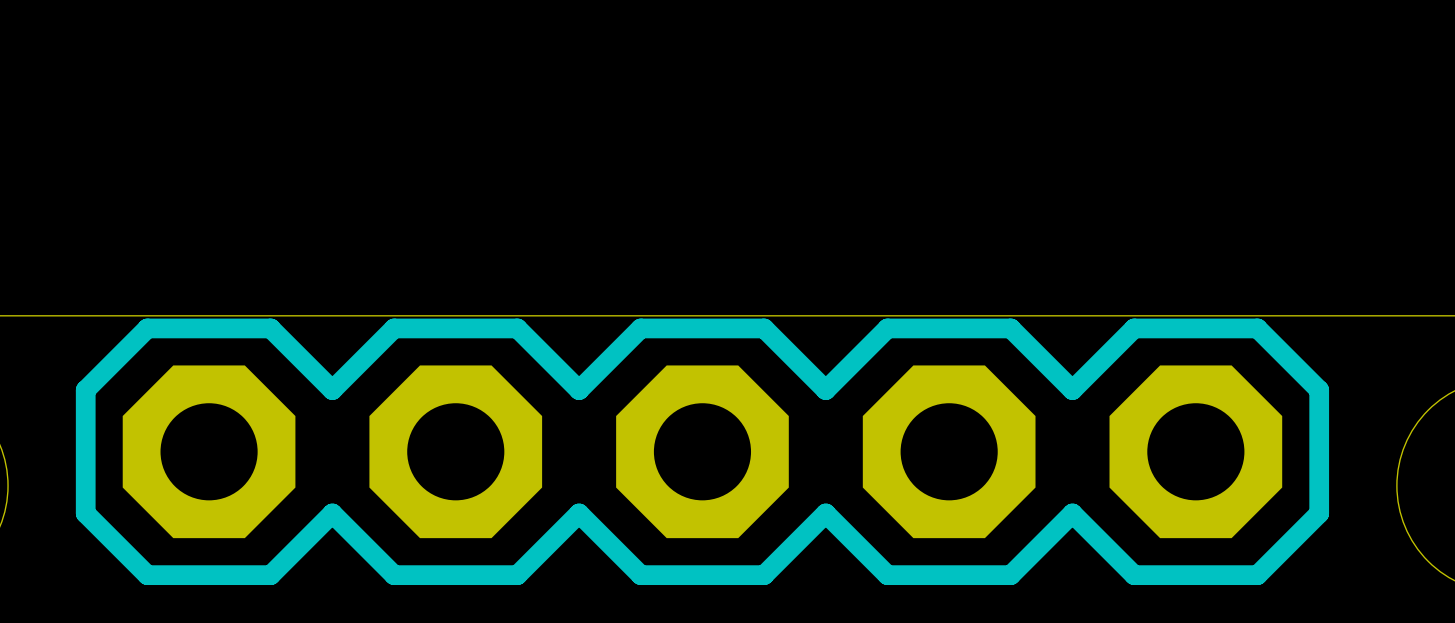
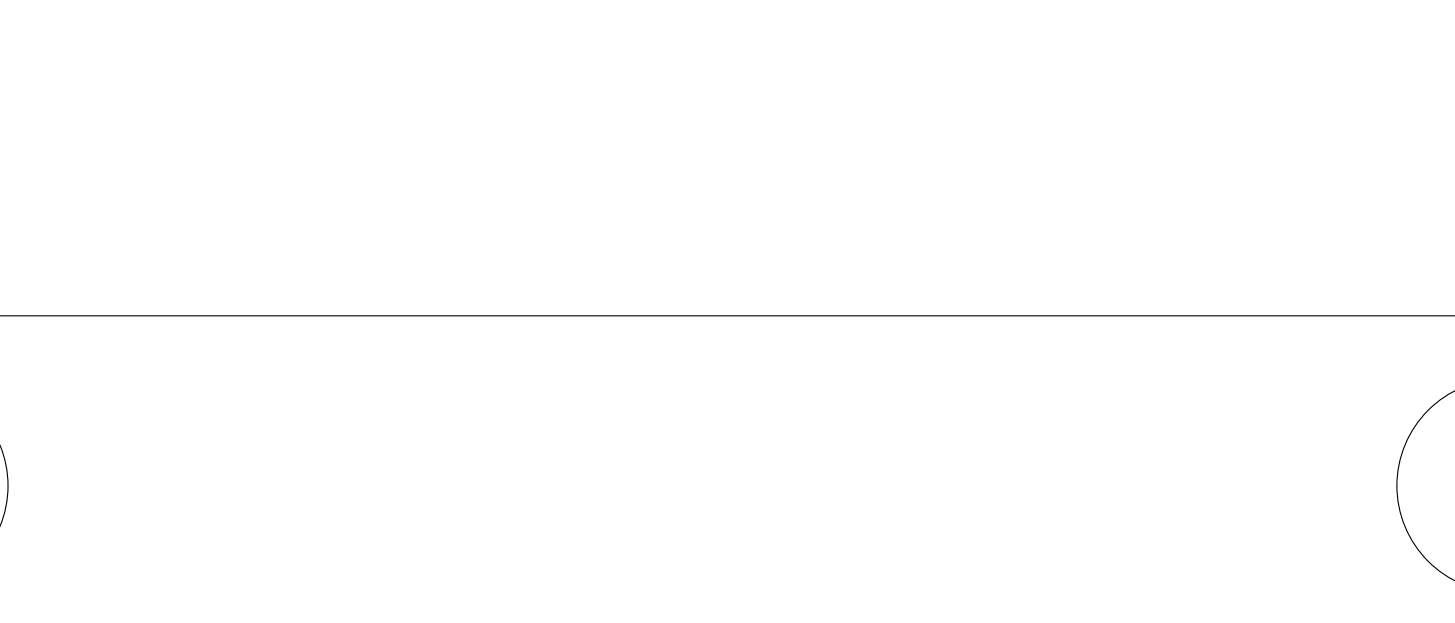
part: (702, 451) -> none

